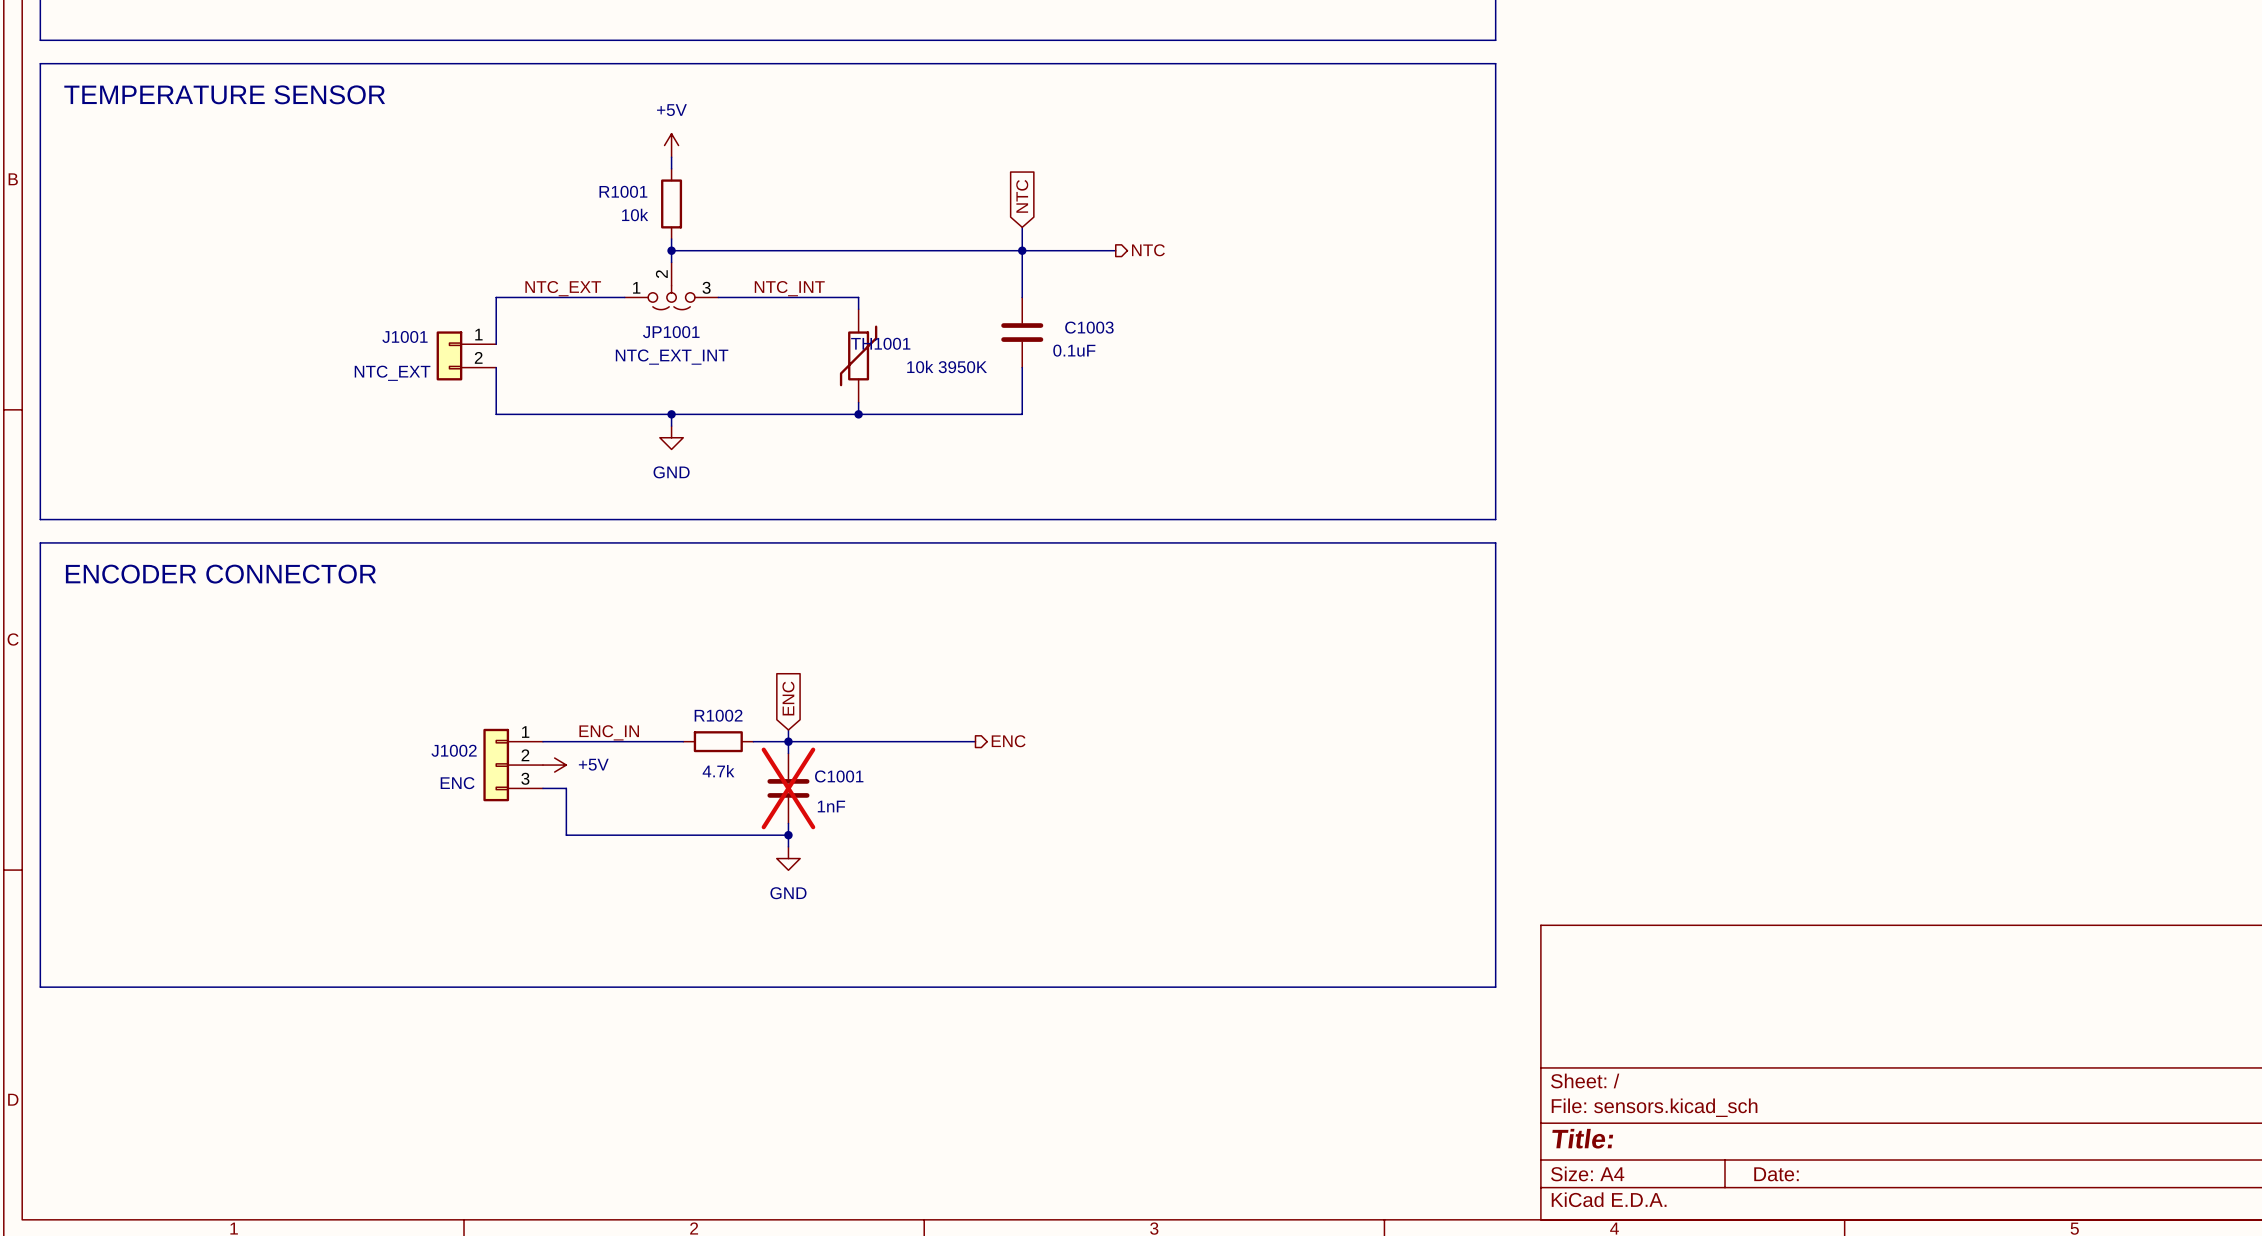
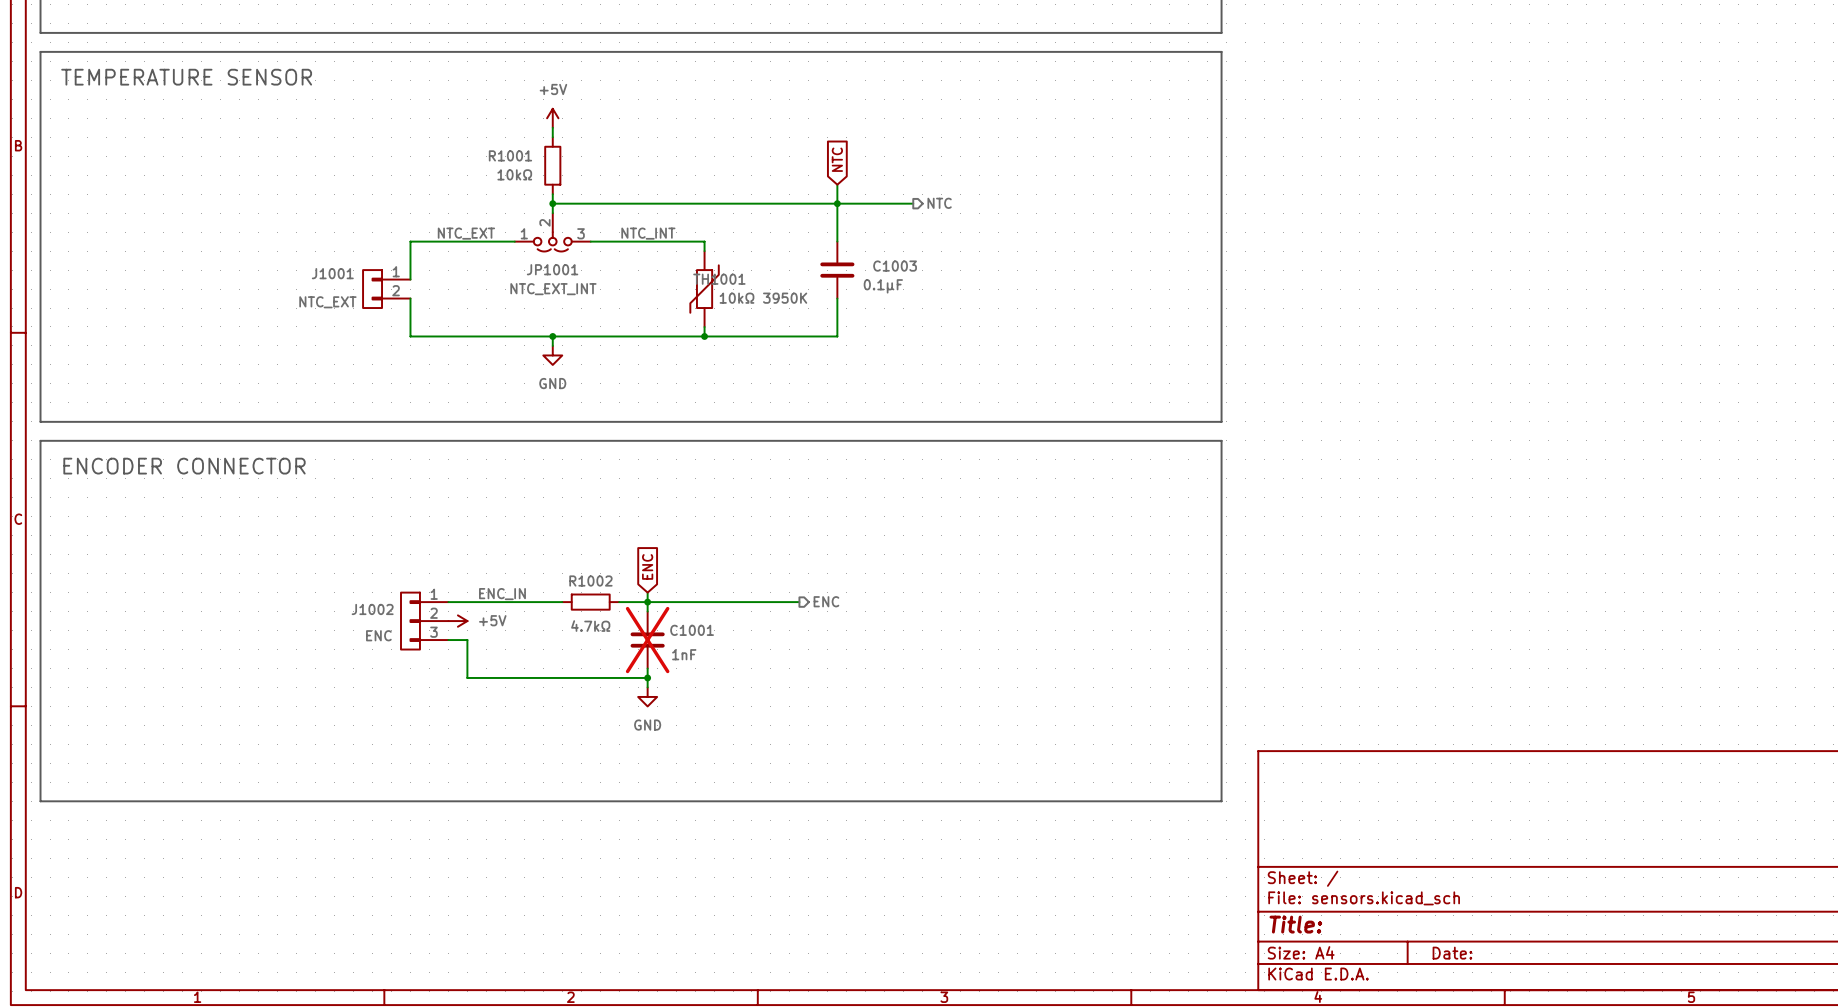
R1001 value: 10k (635, 214) -> 10kΩ (514, 174)
C1003 value: 0.1uF (1074, 350) -> 0.1µF (883, 286)
TH1001 value: 10k 3950K (947, 366) -> 10kΩ 3950K (763, 298)
R1002 value: 4.7k (718, 771) -> 4.7kΩ (590, 626)

